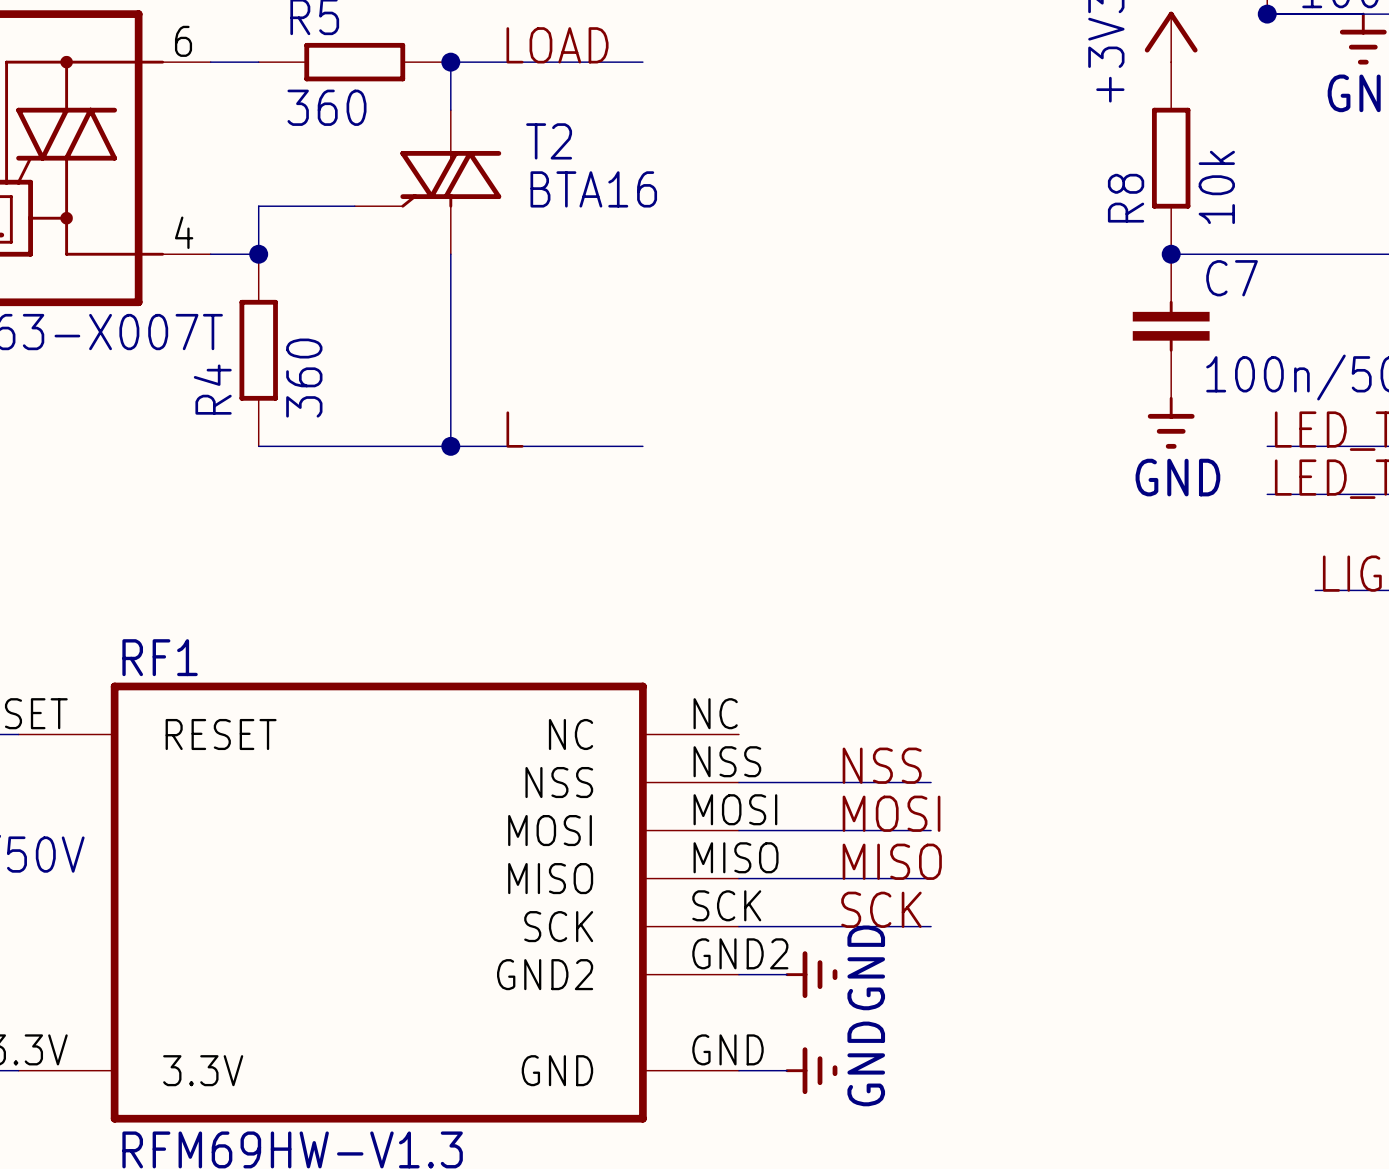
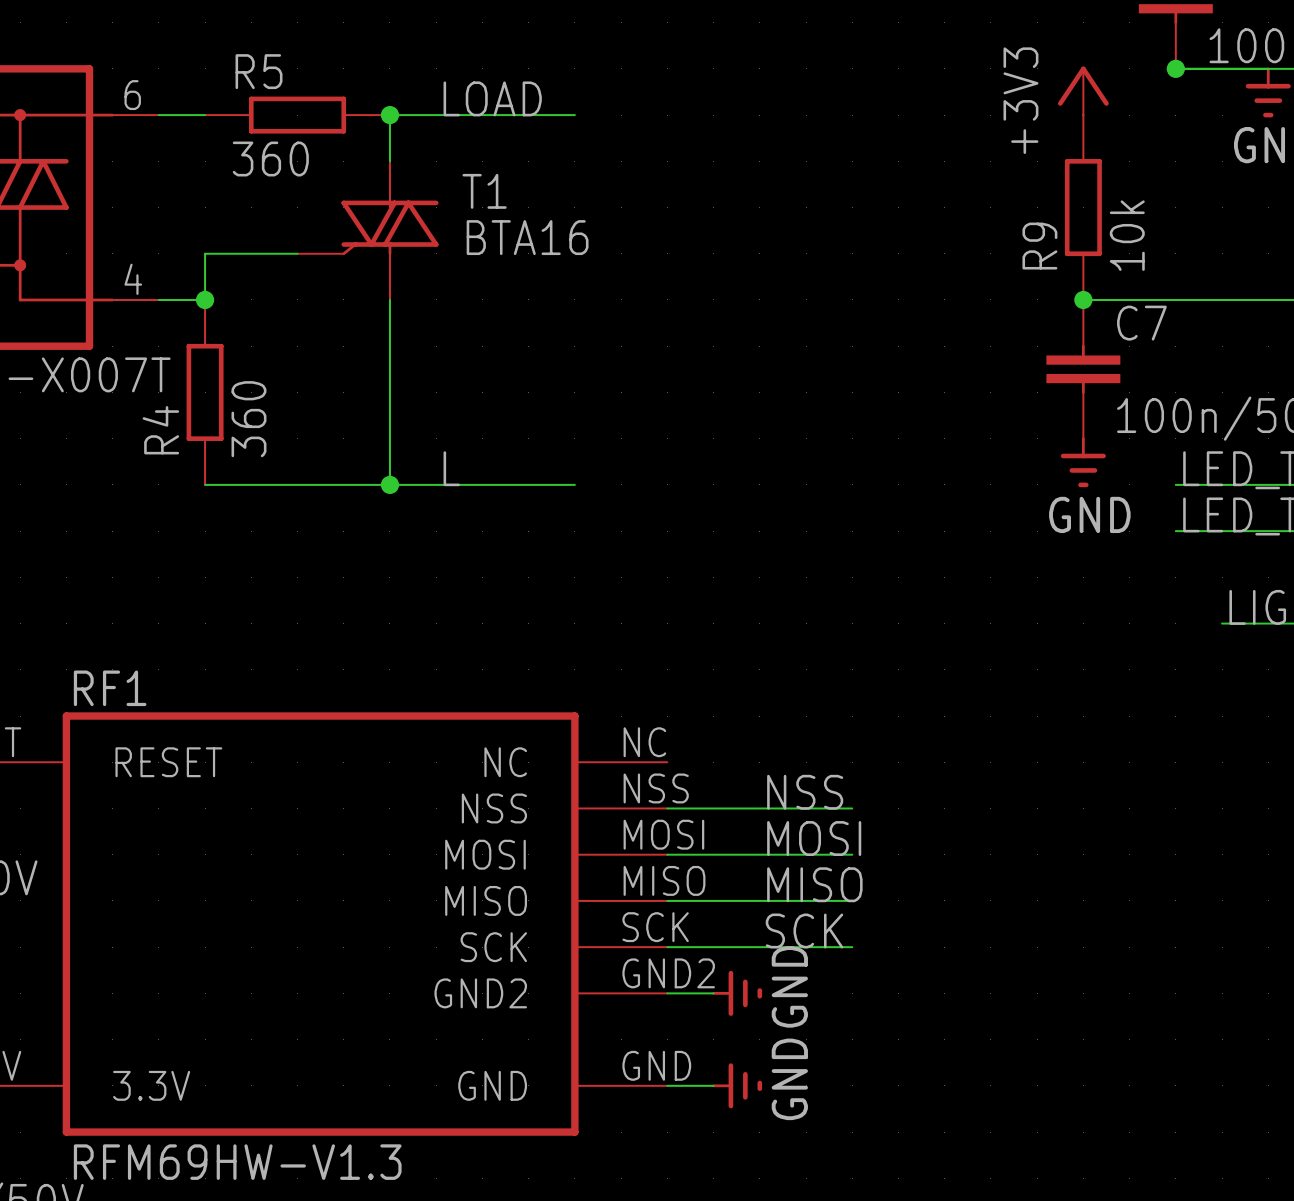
T2 name: T2 (549, 141) -> T1 (484, 191)
R8 name: R8 (1126, 198) -> R9 (1039, 246)

